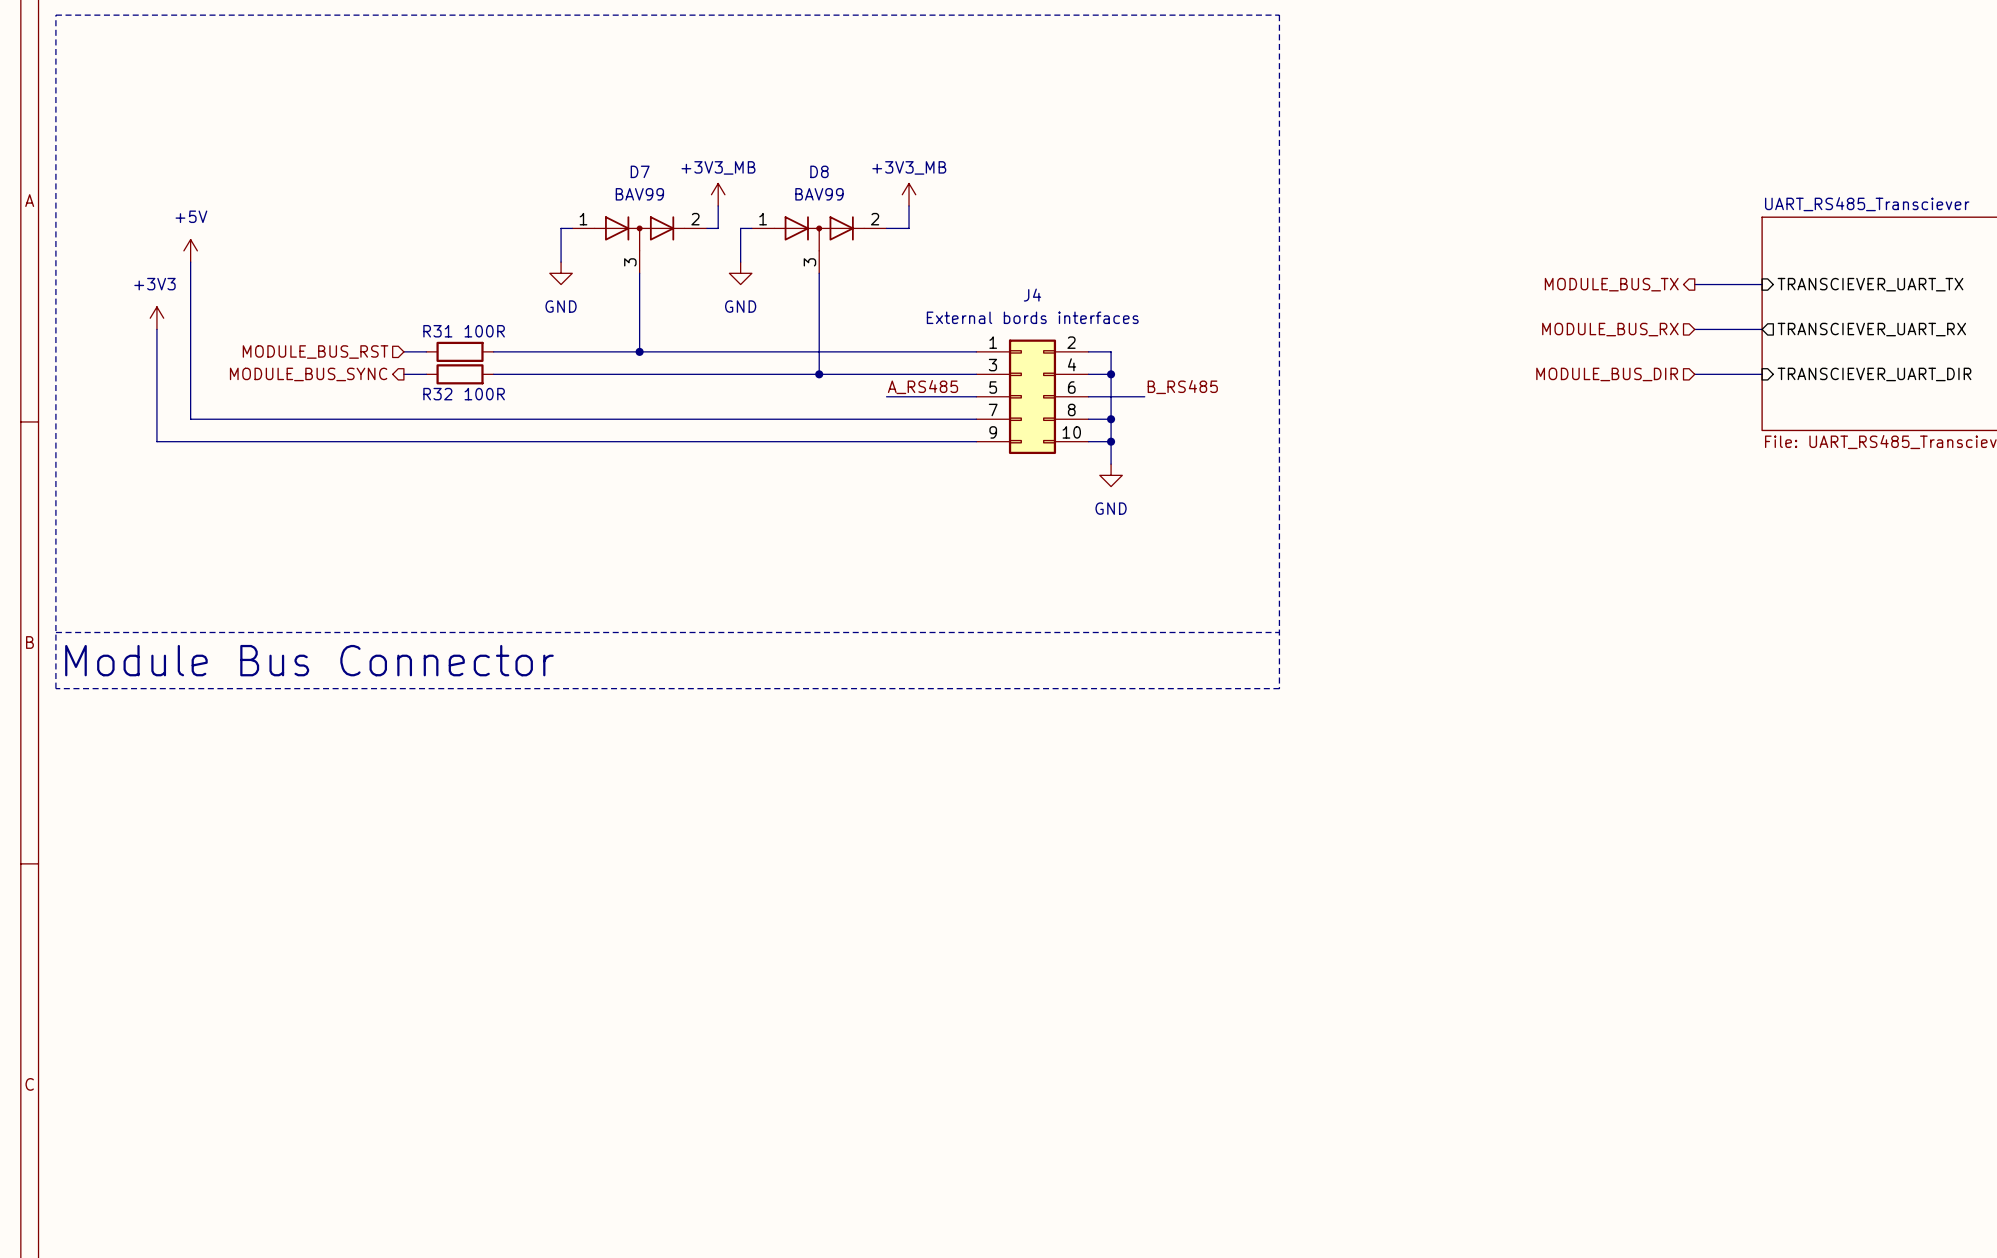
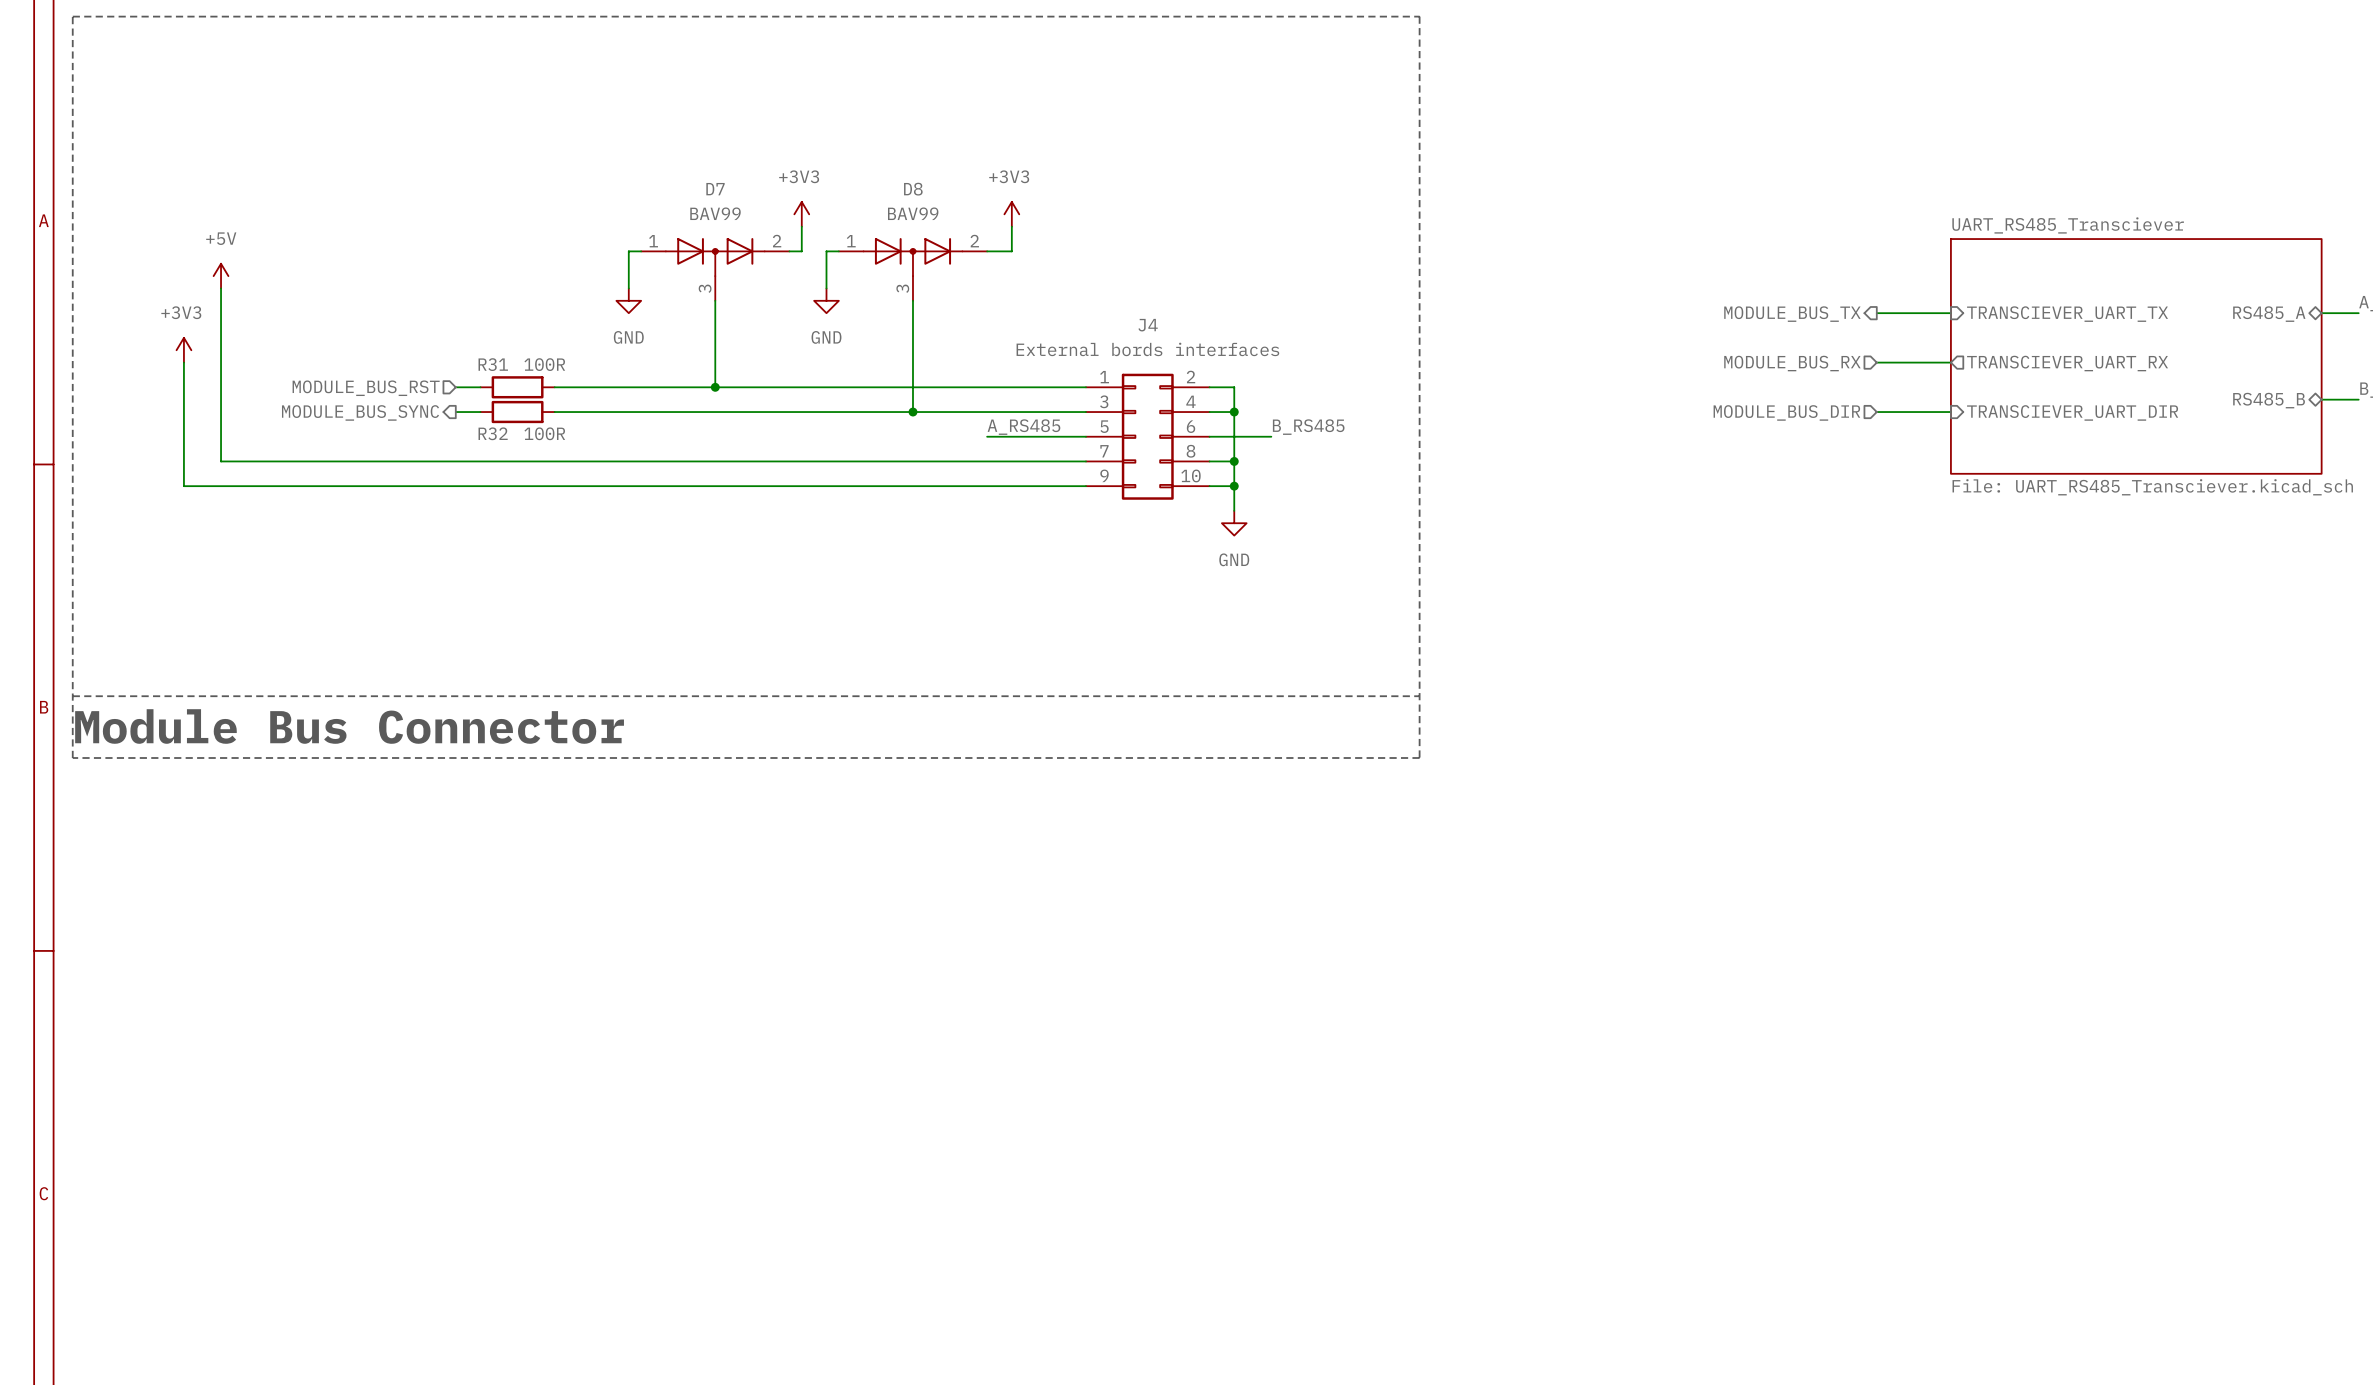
power symbol: +3V3_MB (718, 194) -> +3V3 (801, 214)
power symbol: +3V3_MB (909, 194) -> +3V3 (1011, 214)

